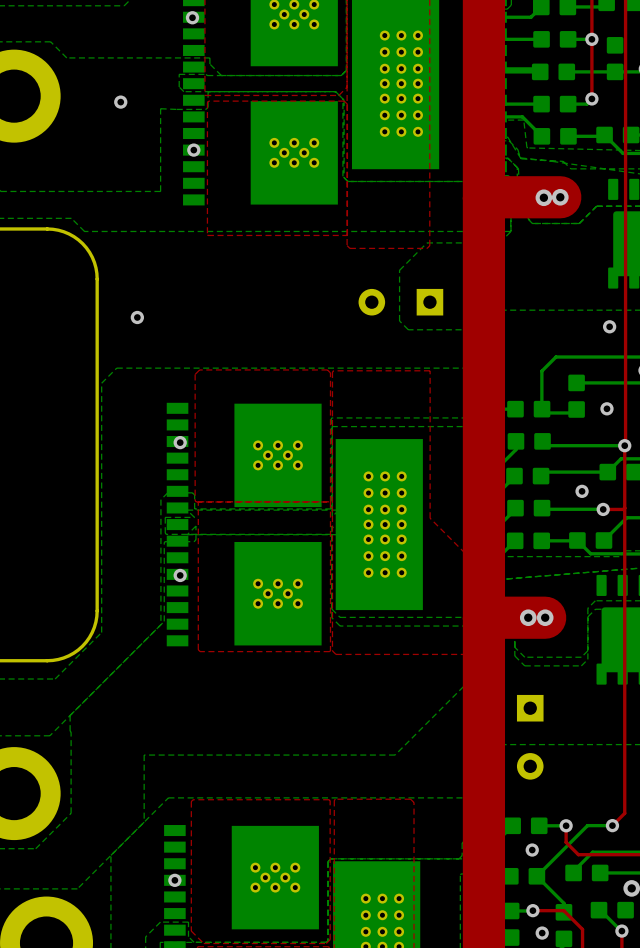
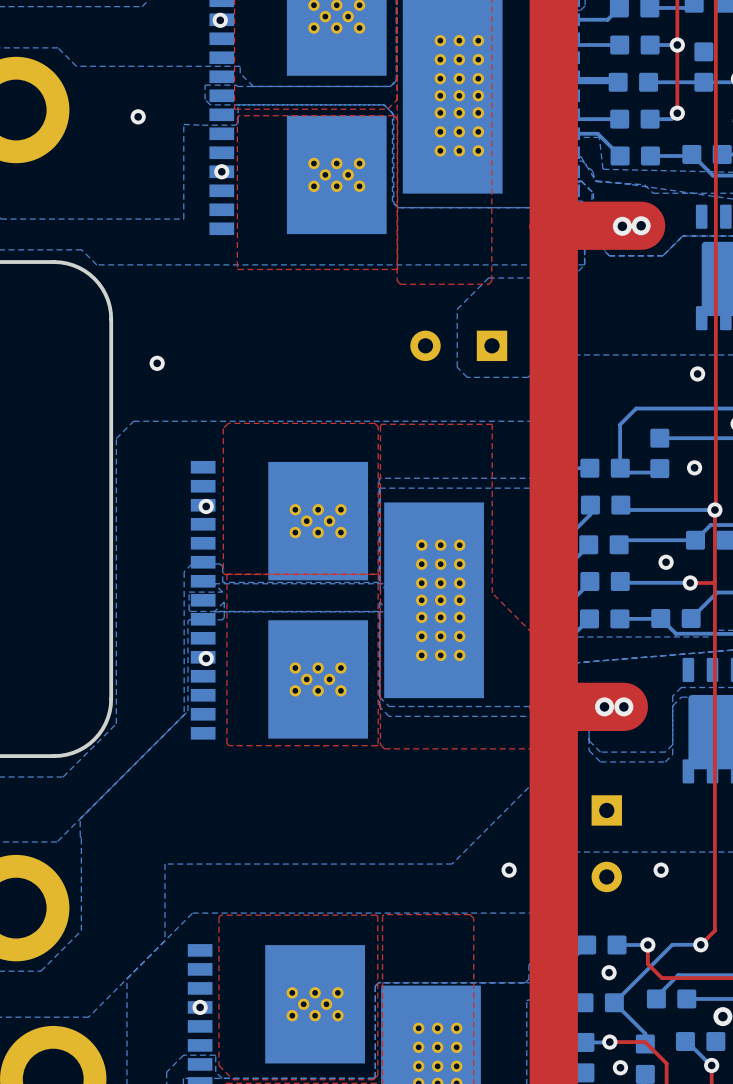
via: none -> (509, 870)
via: none -> (661, 870)

